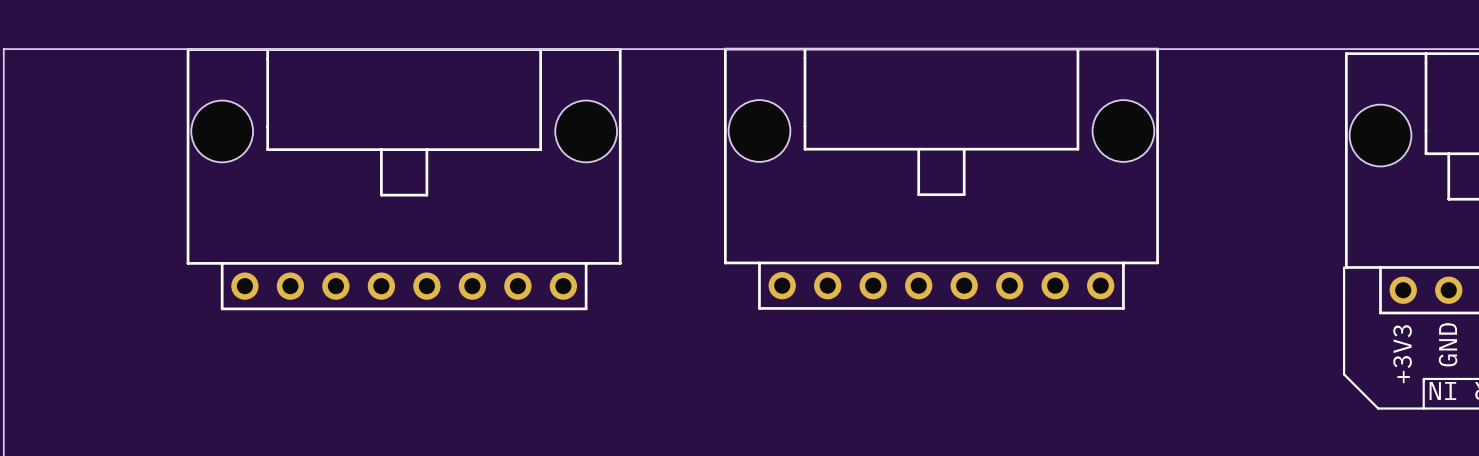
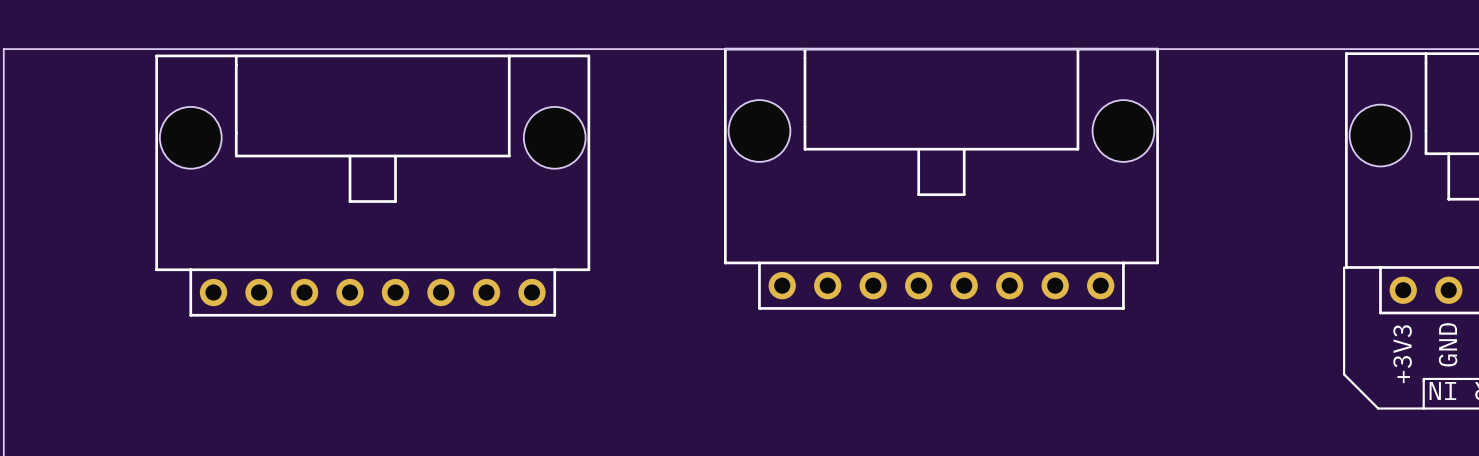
part position: (404, 179) -> (372, 185)

